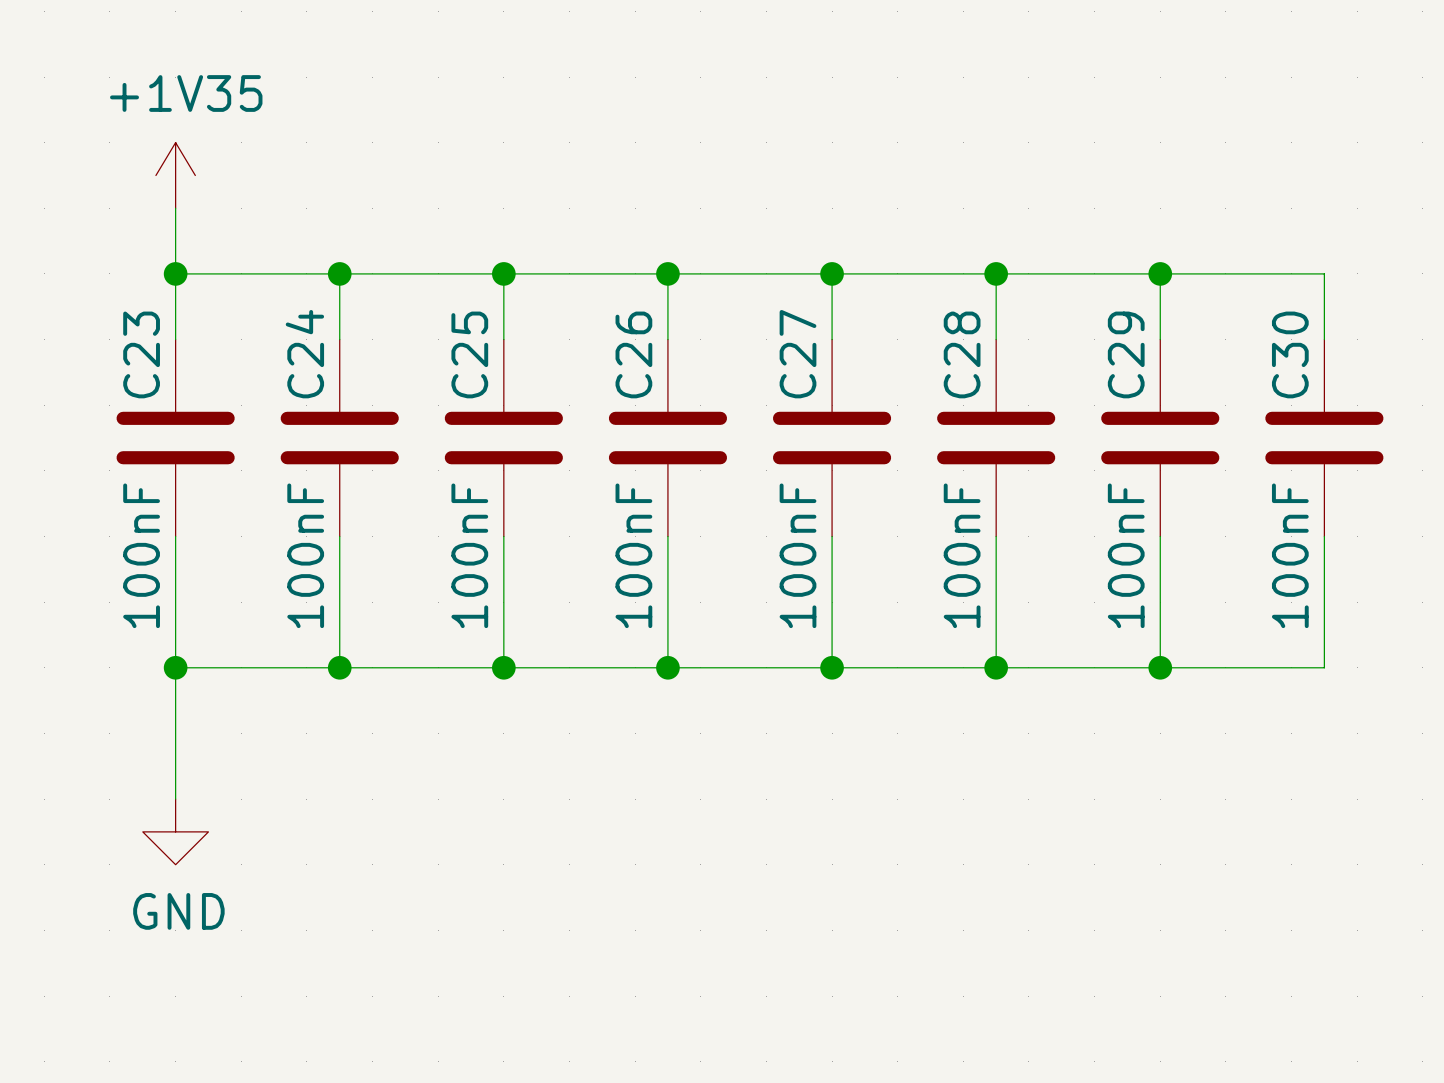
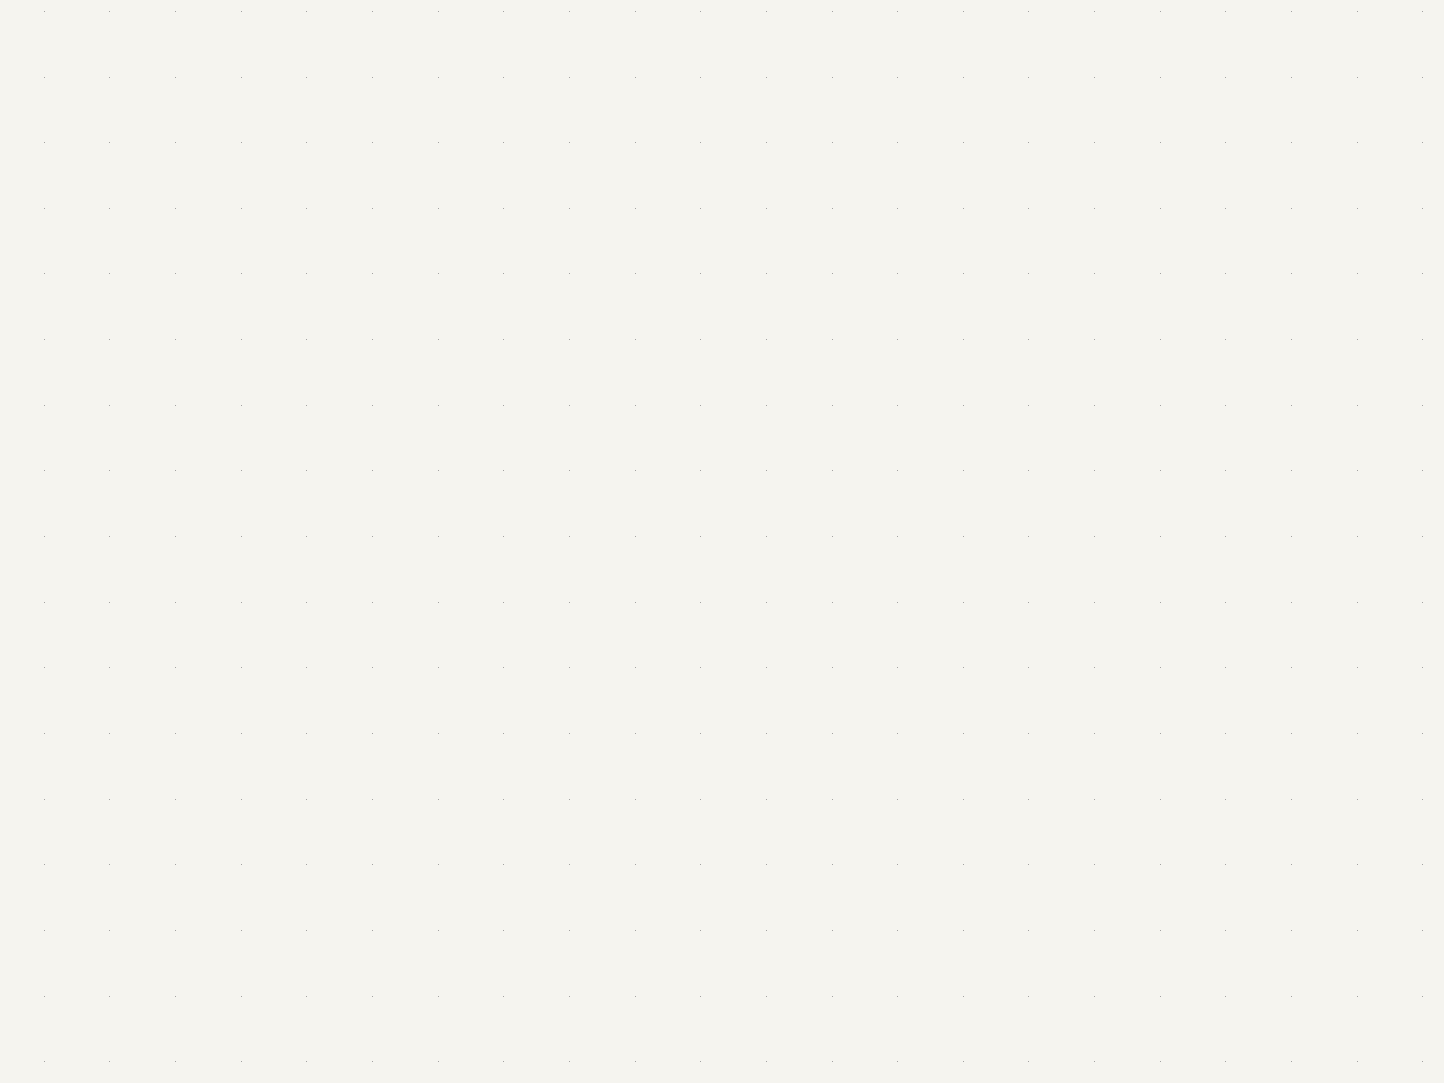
power symbol: +1V35 (175, 175) -> none
wire: (175, 208) (175, 339) -> none
wire: (175, 273) (1324, 273) (1324, 339) -> none
junction: (175, 273) -> none
wire: (339, 273) (339, 339) -> none
junction: (339, 273) -> none
wire: (503, 273) (503, 339) -> none
junction: (503, 273) -> none
wire: (667, 273) (667, 339) -> none
junction: (667, 273) -> none
wire: (832, 273) (832, 339) -> none
junction: (832, 273) -> none
wire: (996, 273) (996, 339) -> none
junction: (996, 273) -> none
wire: (1160, 273) (1160, 339) -> none
junction: (1160, 273) -> none
C23: 100nF (175, 438) -> none
C24: 100nF (339, 438) -> none
C25: 100nF (503, 438) -> none
C26: 100nF (667, 438) -> none
C27: 100nF (832, 438) -> none
C28: 100nF (996, 438) -> none
C29: 100nF (1160, 438) -> none
C30: 100nF (1324, 438) -> none
wire: (175, 536) (175, 799) -> none
wire: (339, 536) (339, 667) -> none
wire: (503, 536) (503, 667) -> none
wire: (667, 536) (667, 667) -> none
wire: (832, 536) (832, 667) -> none
wire: (996, 536) (996, 667) -> none
wire: (1160, 536) (1160, 667) -> none
wire: (1324, 536) (1324, 667) (175, 667) -> none
junction: (175, 667) -> none
junction: (339, 667) -> none
junction: (503, 667) -> none
junction: (667, 667) -> none
junction: (832, 667) -> none
junction: (996, 667) -> none
junction: (1160, 667) -> none
power symbol: GND (175, 831) -> none

